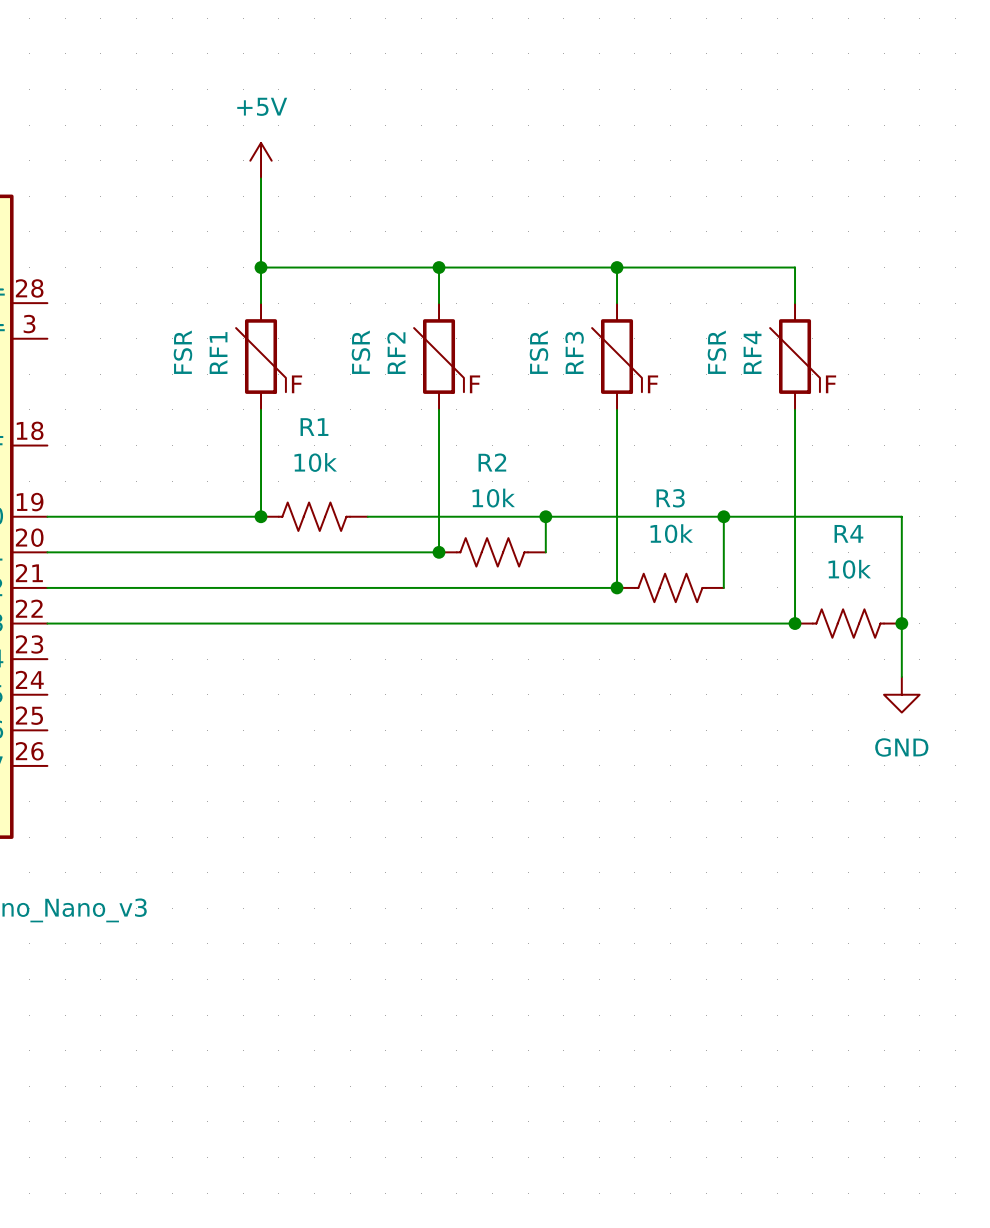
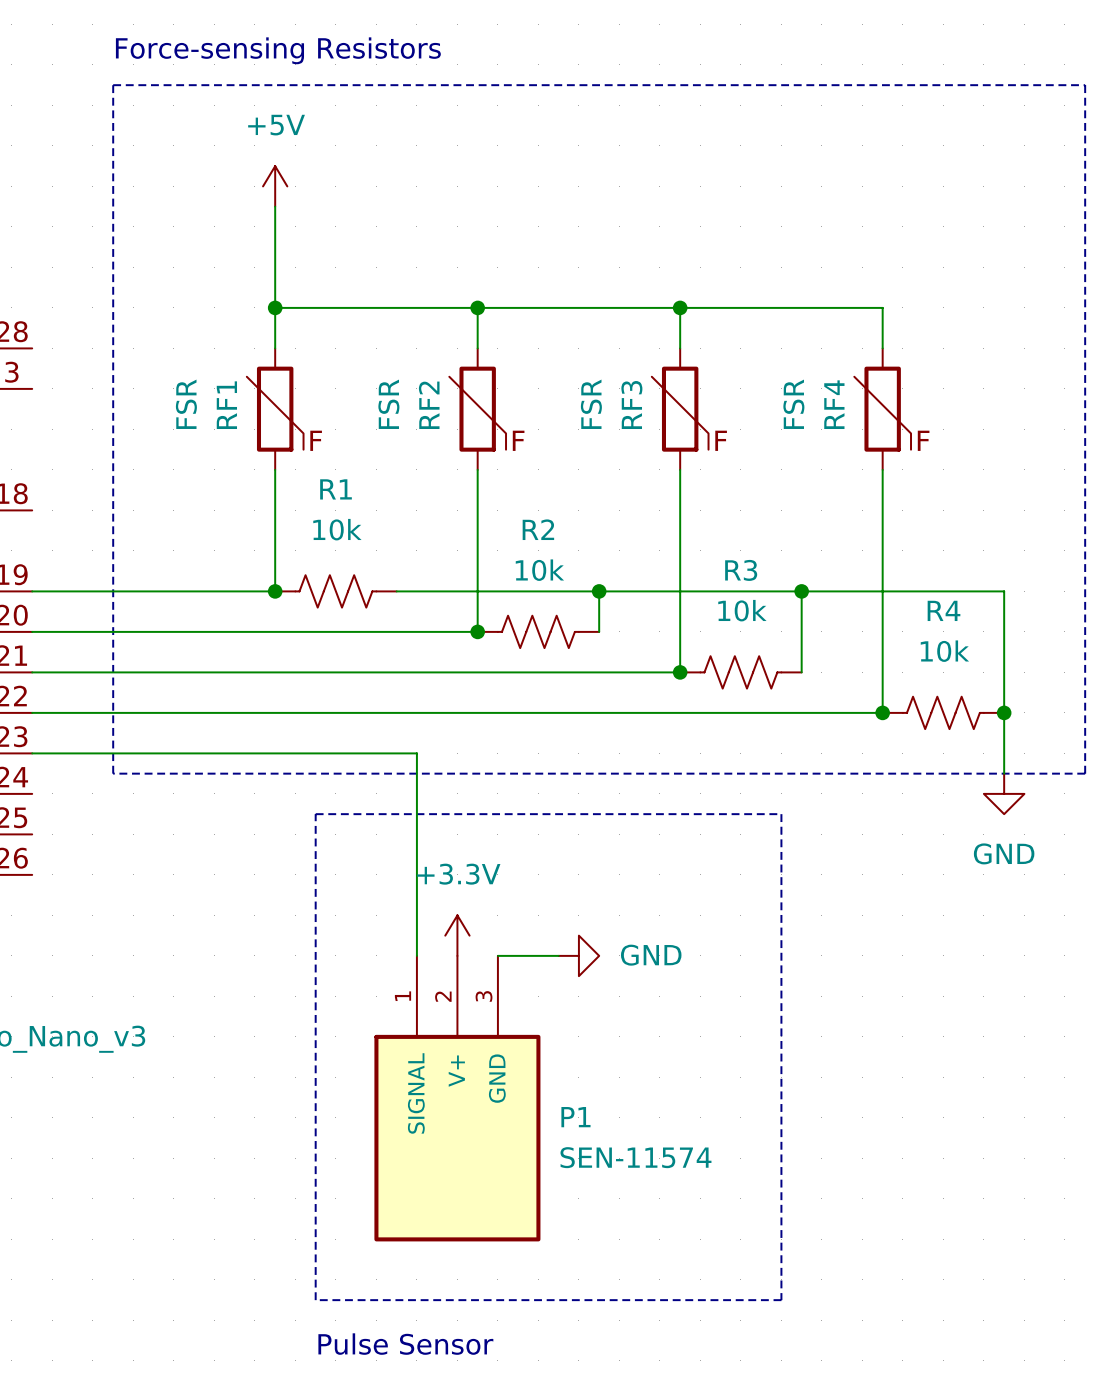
text: none -> Force-sensing Resistors (278, 50)
line: none -> (113, 85) (1085, 85) (1085, 773) (113, 773) (113, 85)
wire: none -> (32, 753) (416, 753) (416, 955)
line: none -> (315, 814) (781, 814) (781, 1300) (315, 1300) (315, 814)
power symbol: none -> +3.3V (457, 935)
wire: none -> (497, 955) (558, 955)
power symbol: none -> GND (578, 955)
P1: none -> SEN-11574 (457, 1098)
text: none -> Pulse Sensor (405, 1344)

